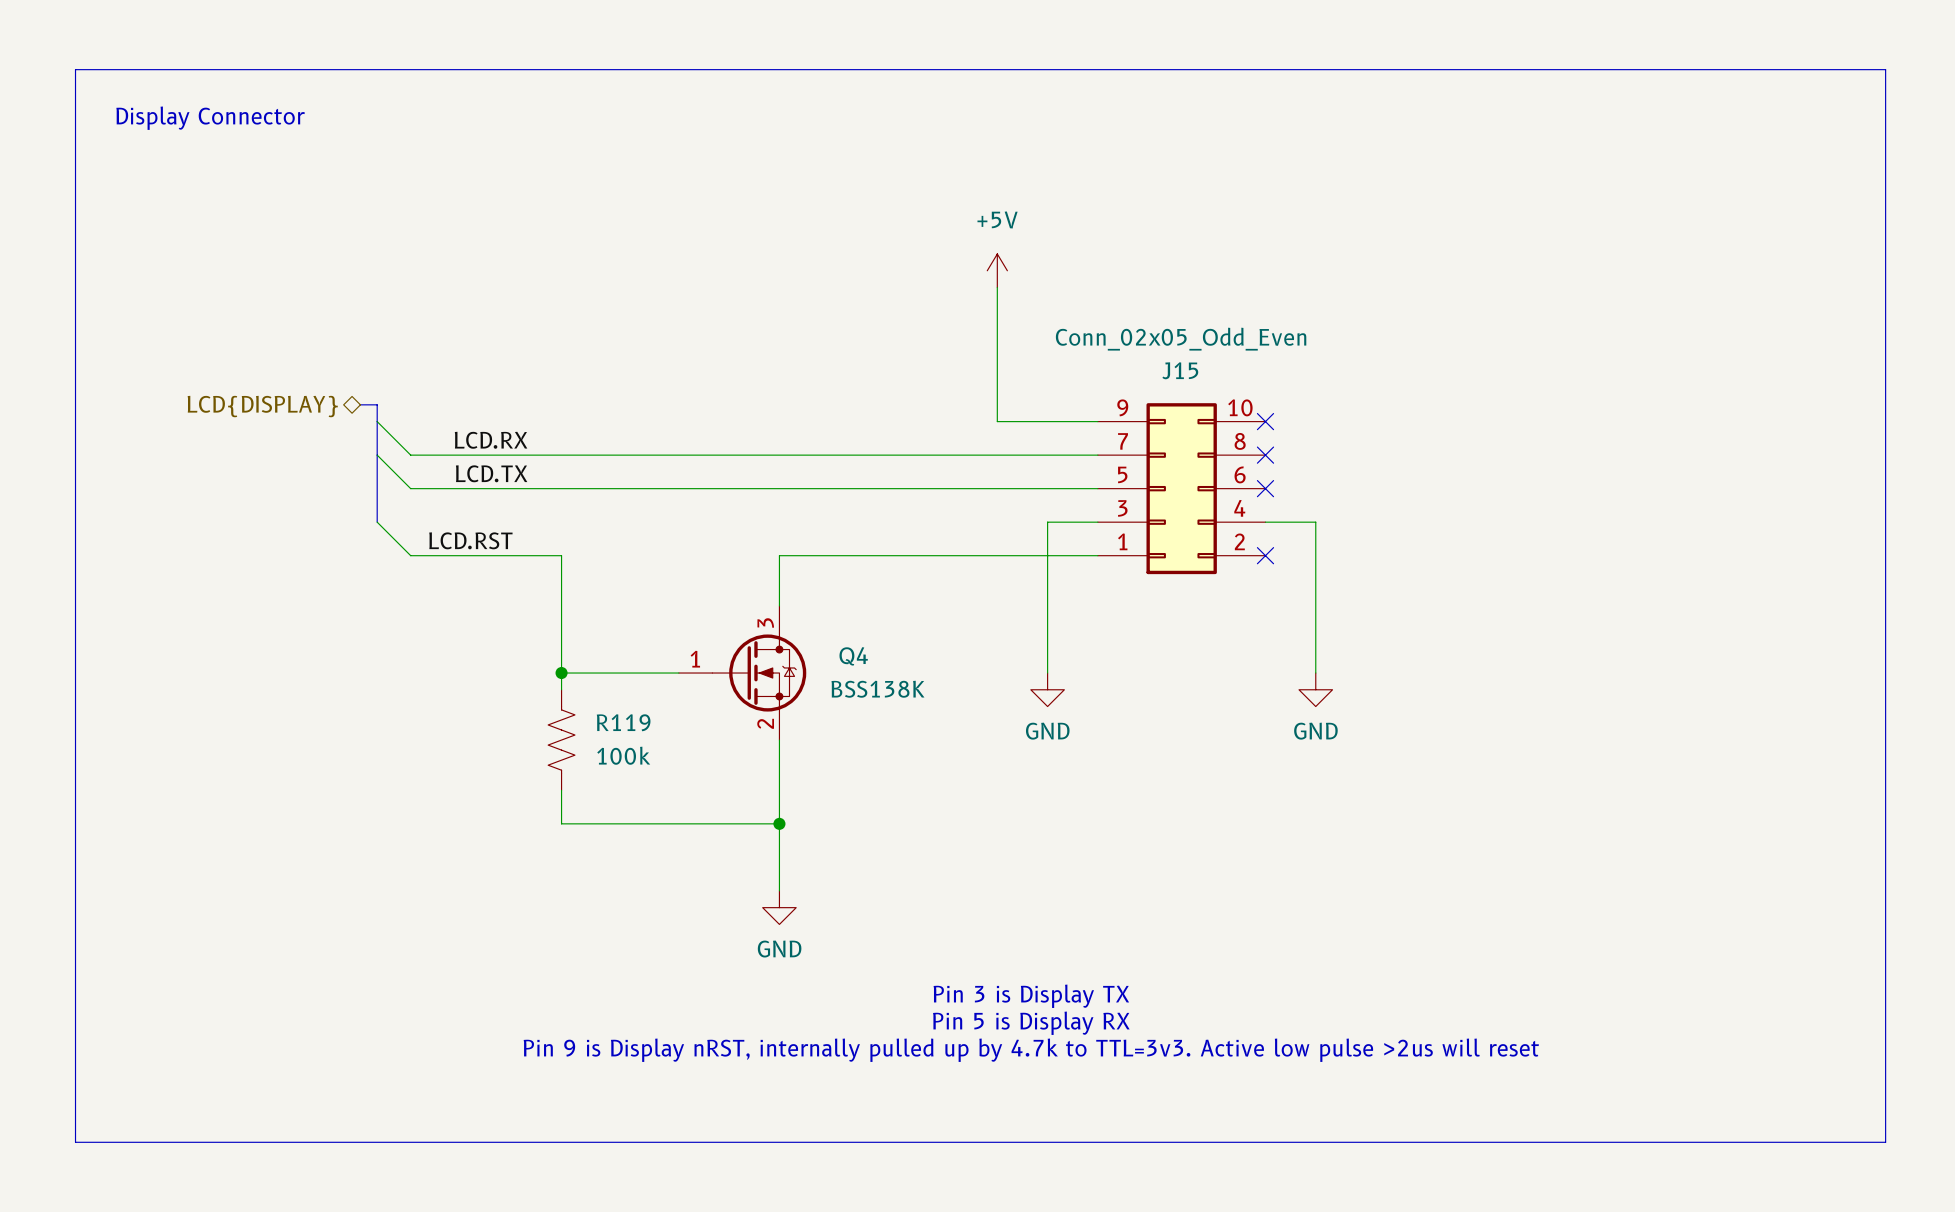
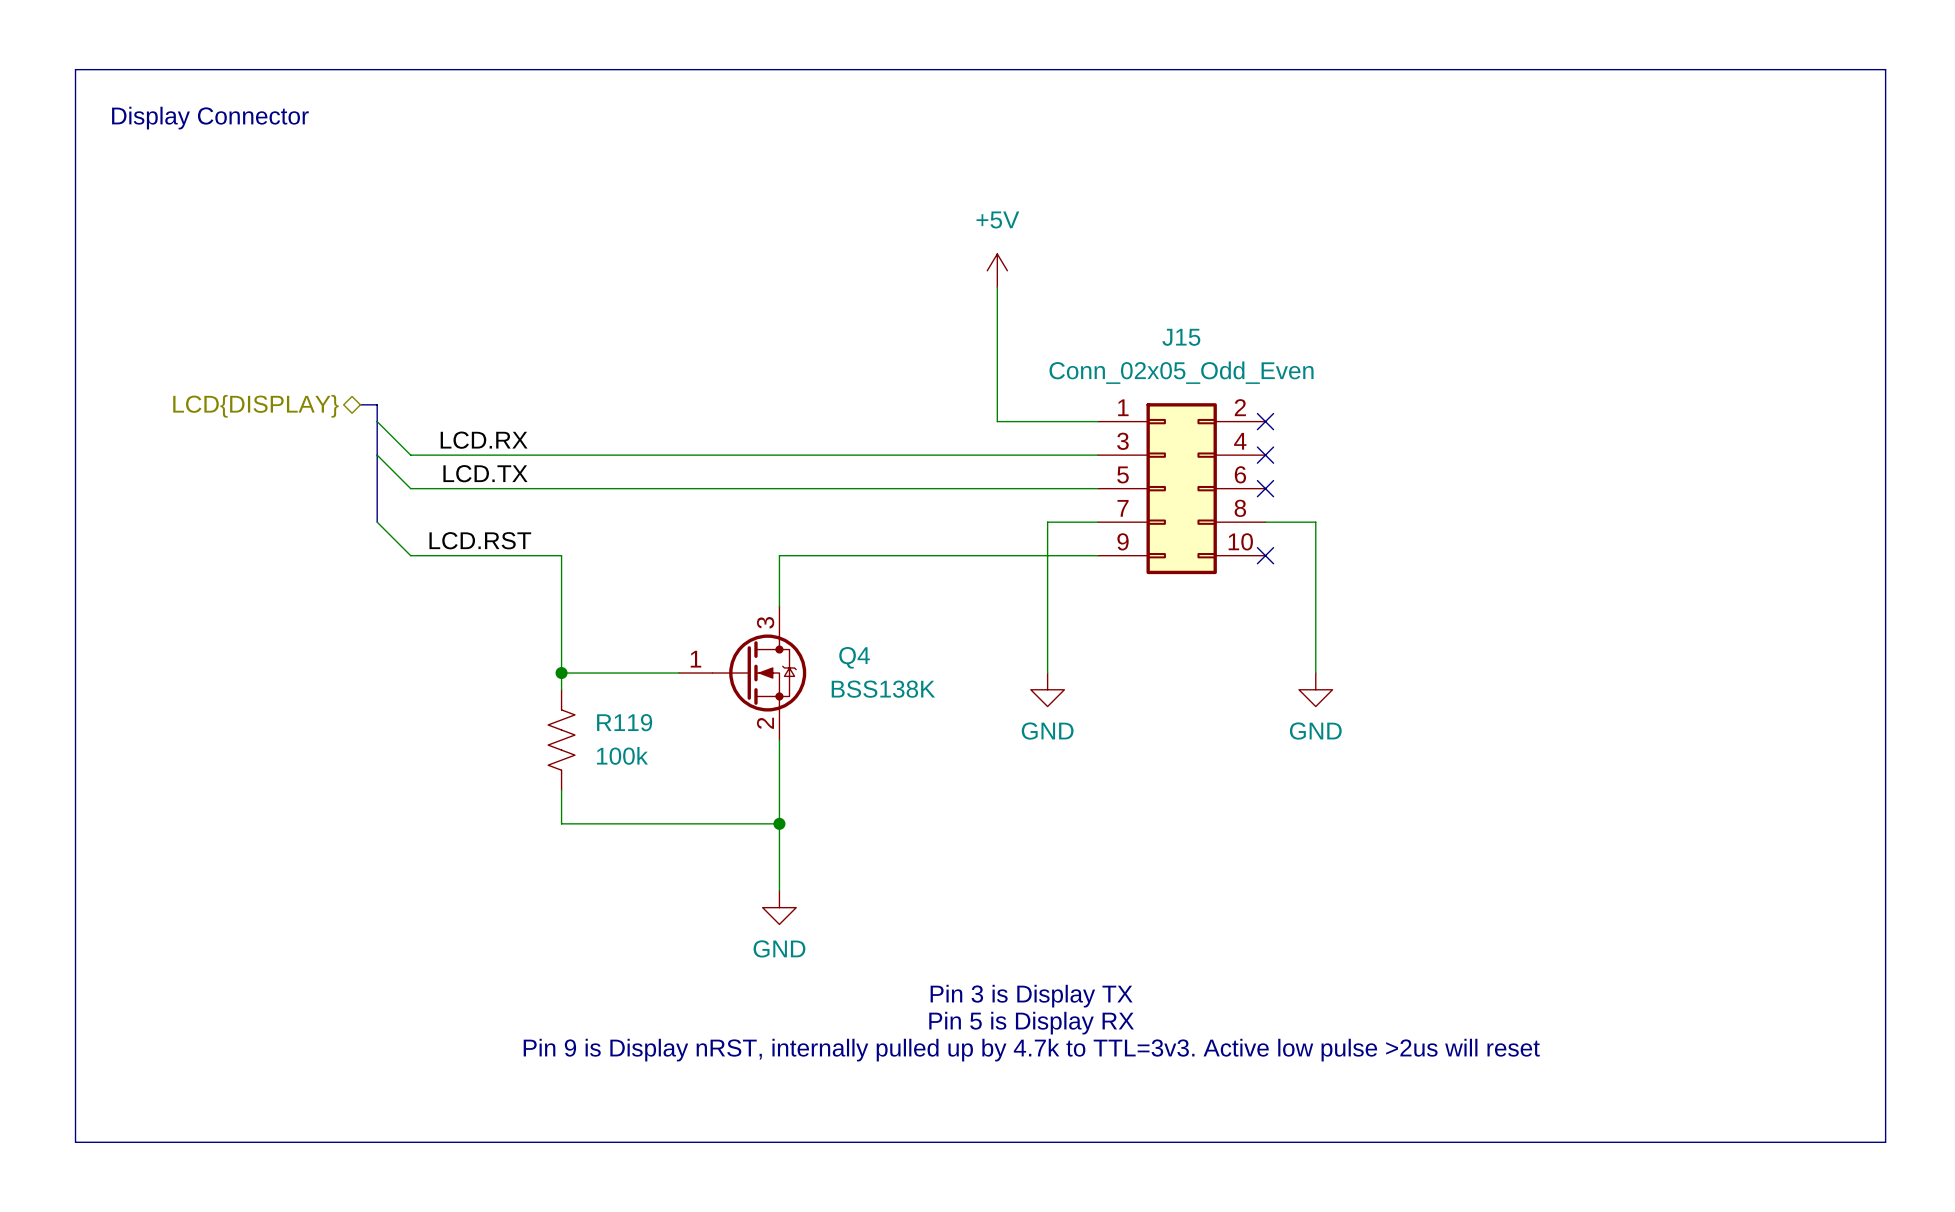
J15 value position: Conn_02x05_Odd_Even (1181, 339) -> Conn_02x05_Odd_Even (1181, 372)
J15 name position: J15 (1180, 370) -> J15 (1181, 337)
J15 flip: as is (1181, 488) -> up-down (1181, 488)

